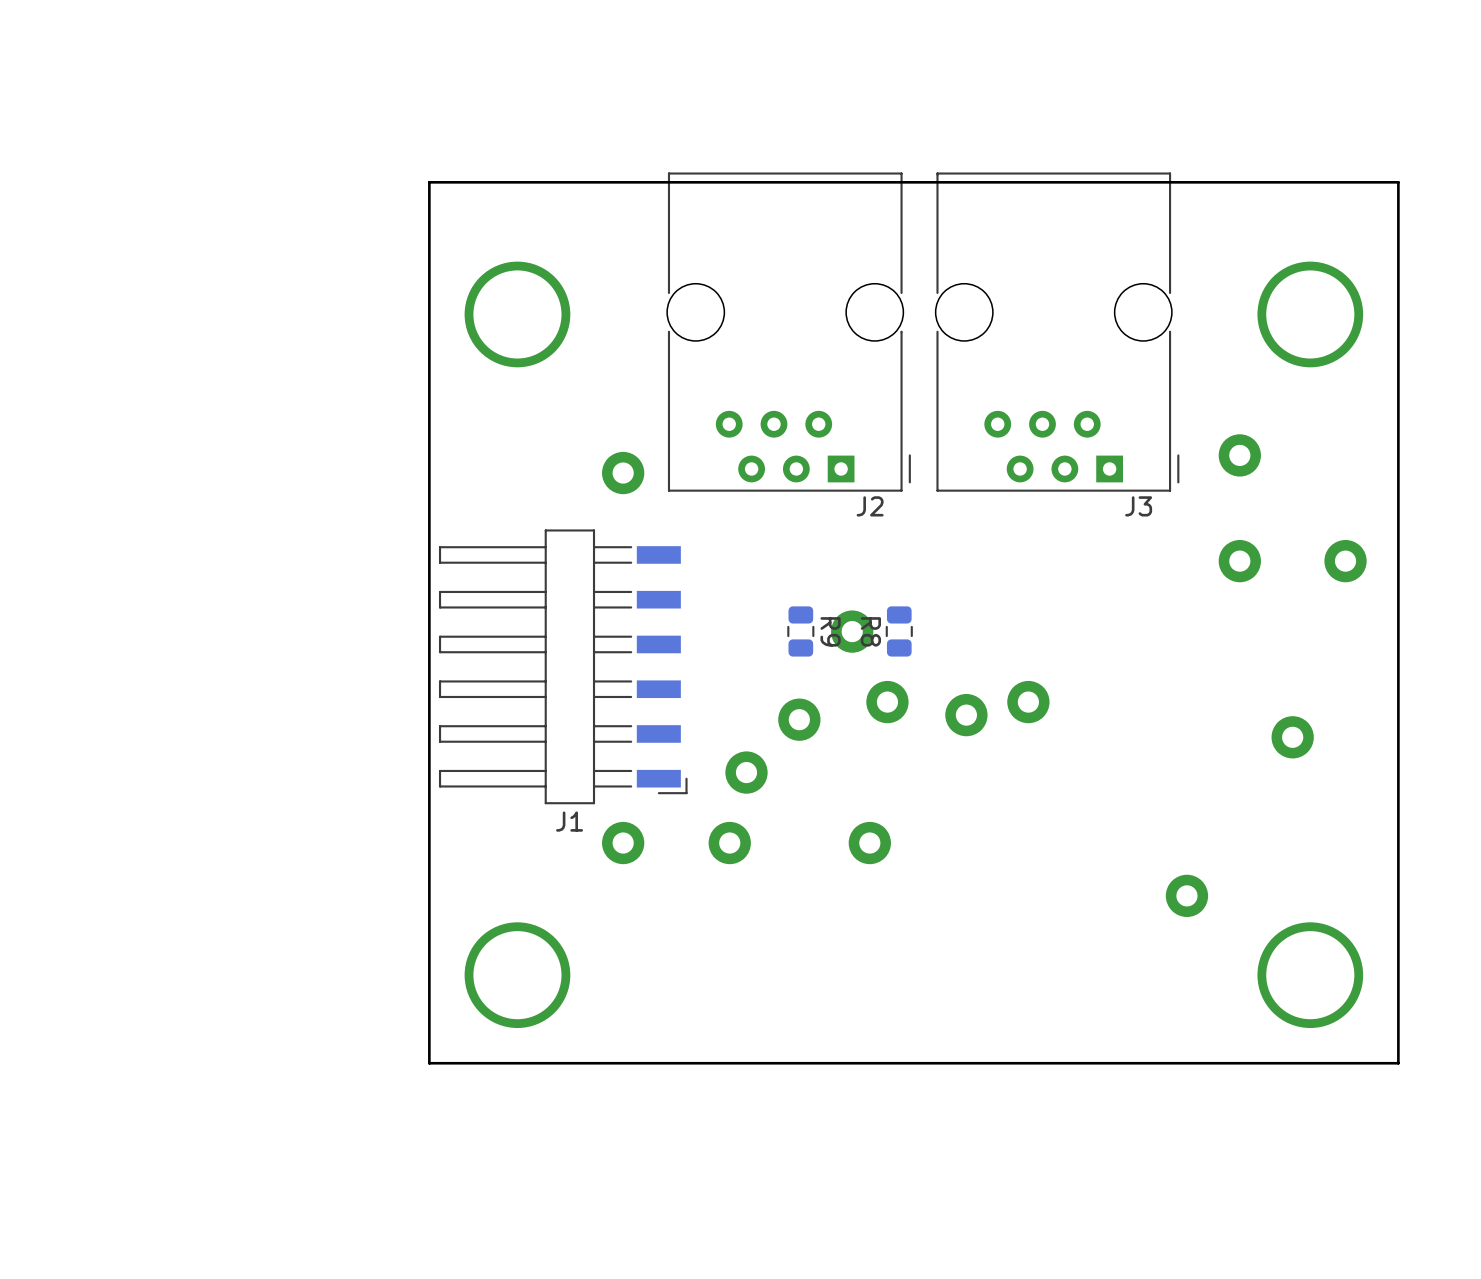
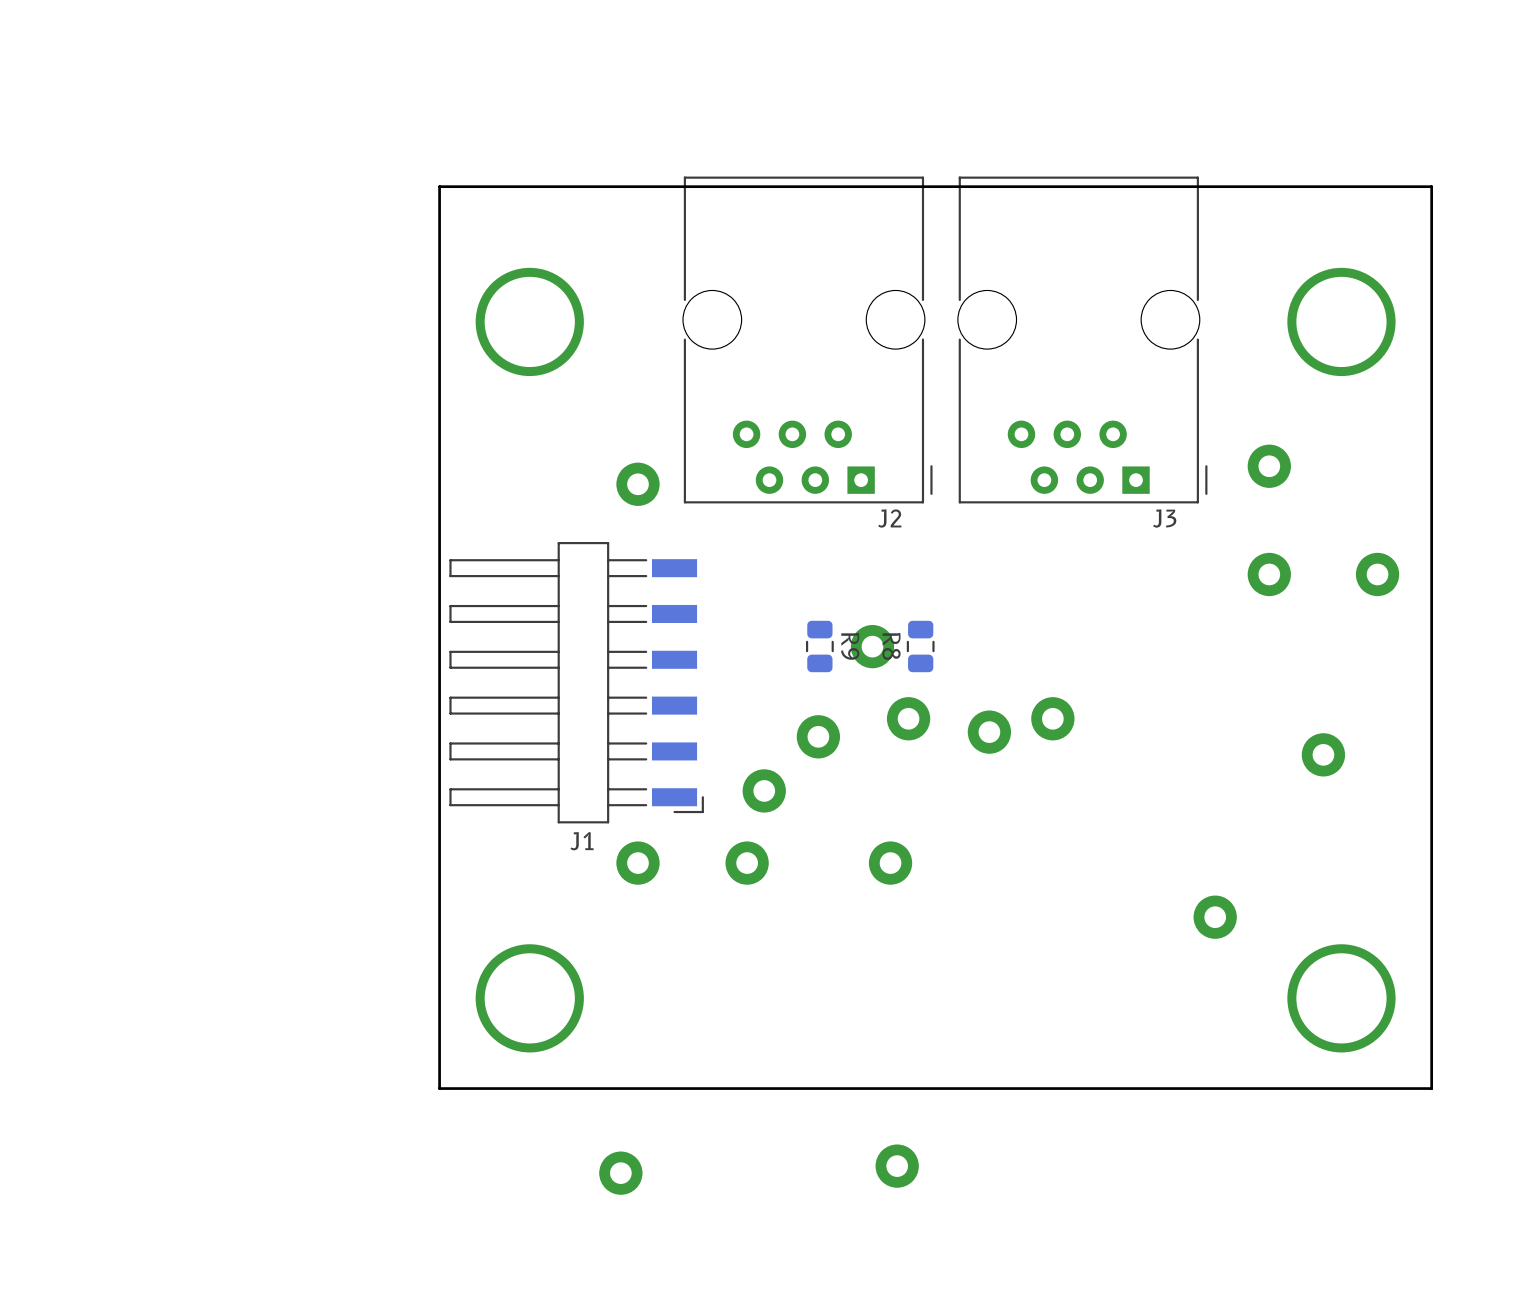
part: none -> (897, 1166)
part: none -> (620, 1173)

